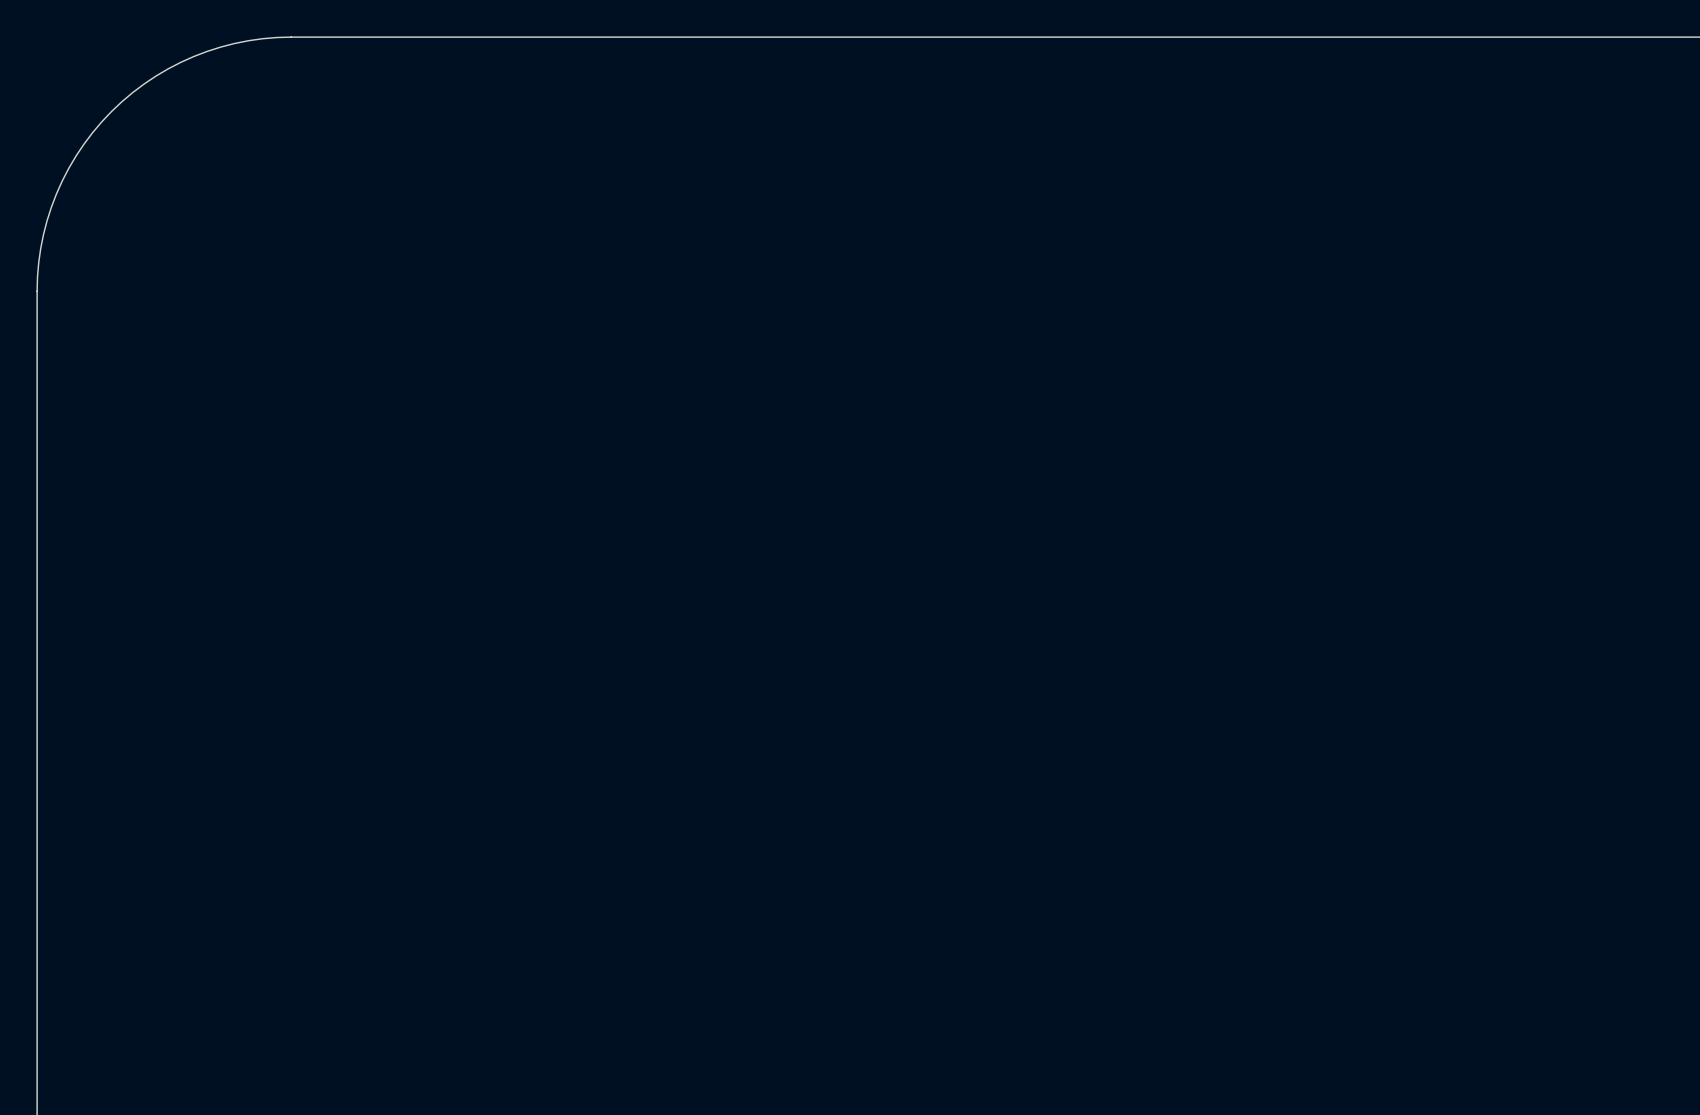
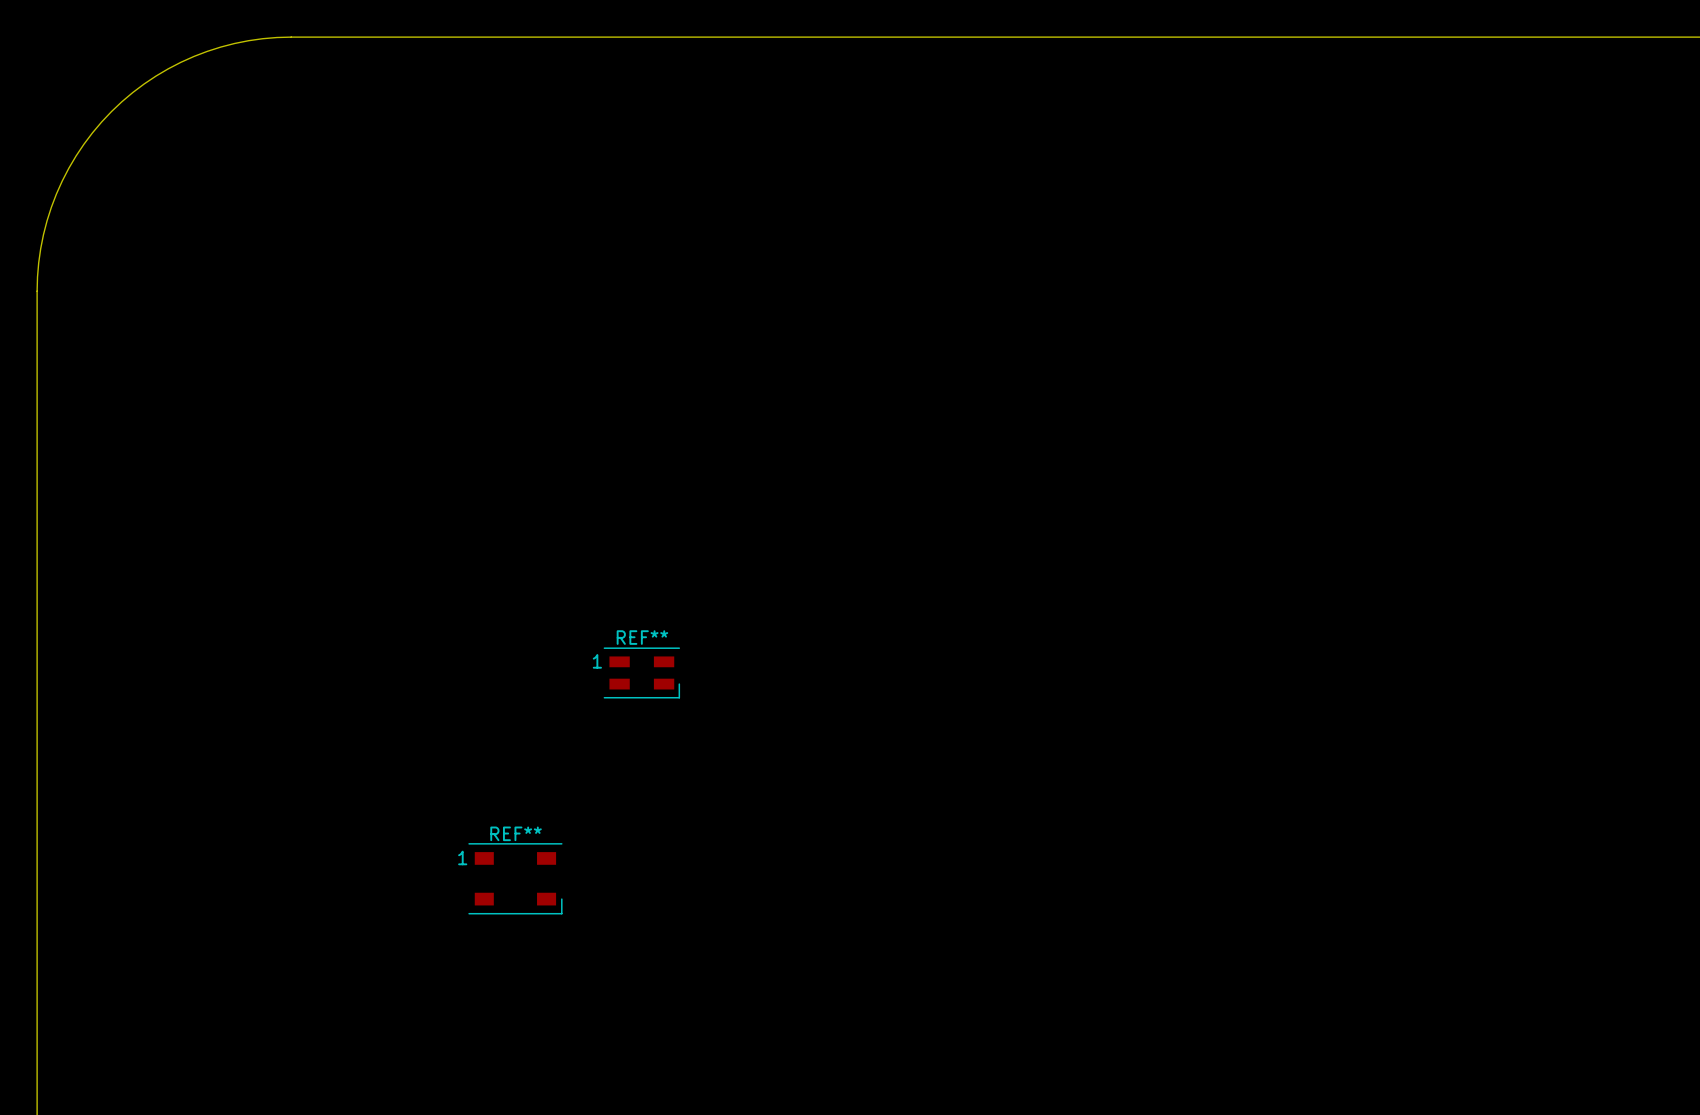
REF**: none -> (641, 672)
REF**: none -> (515, 878)

